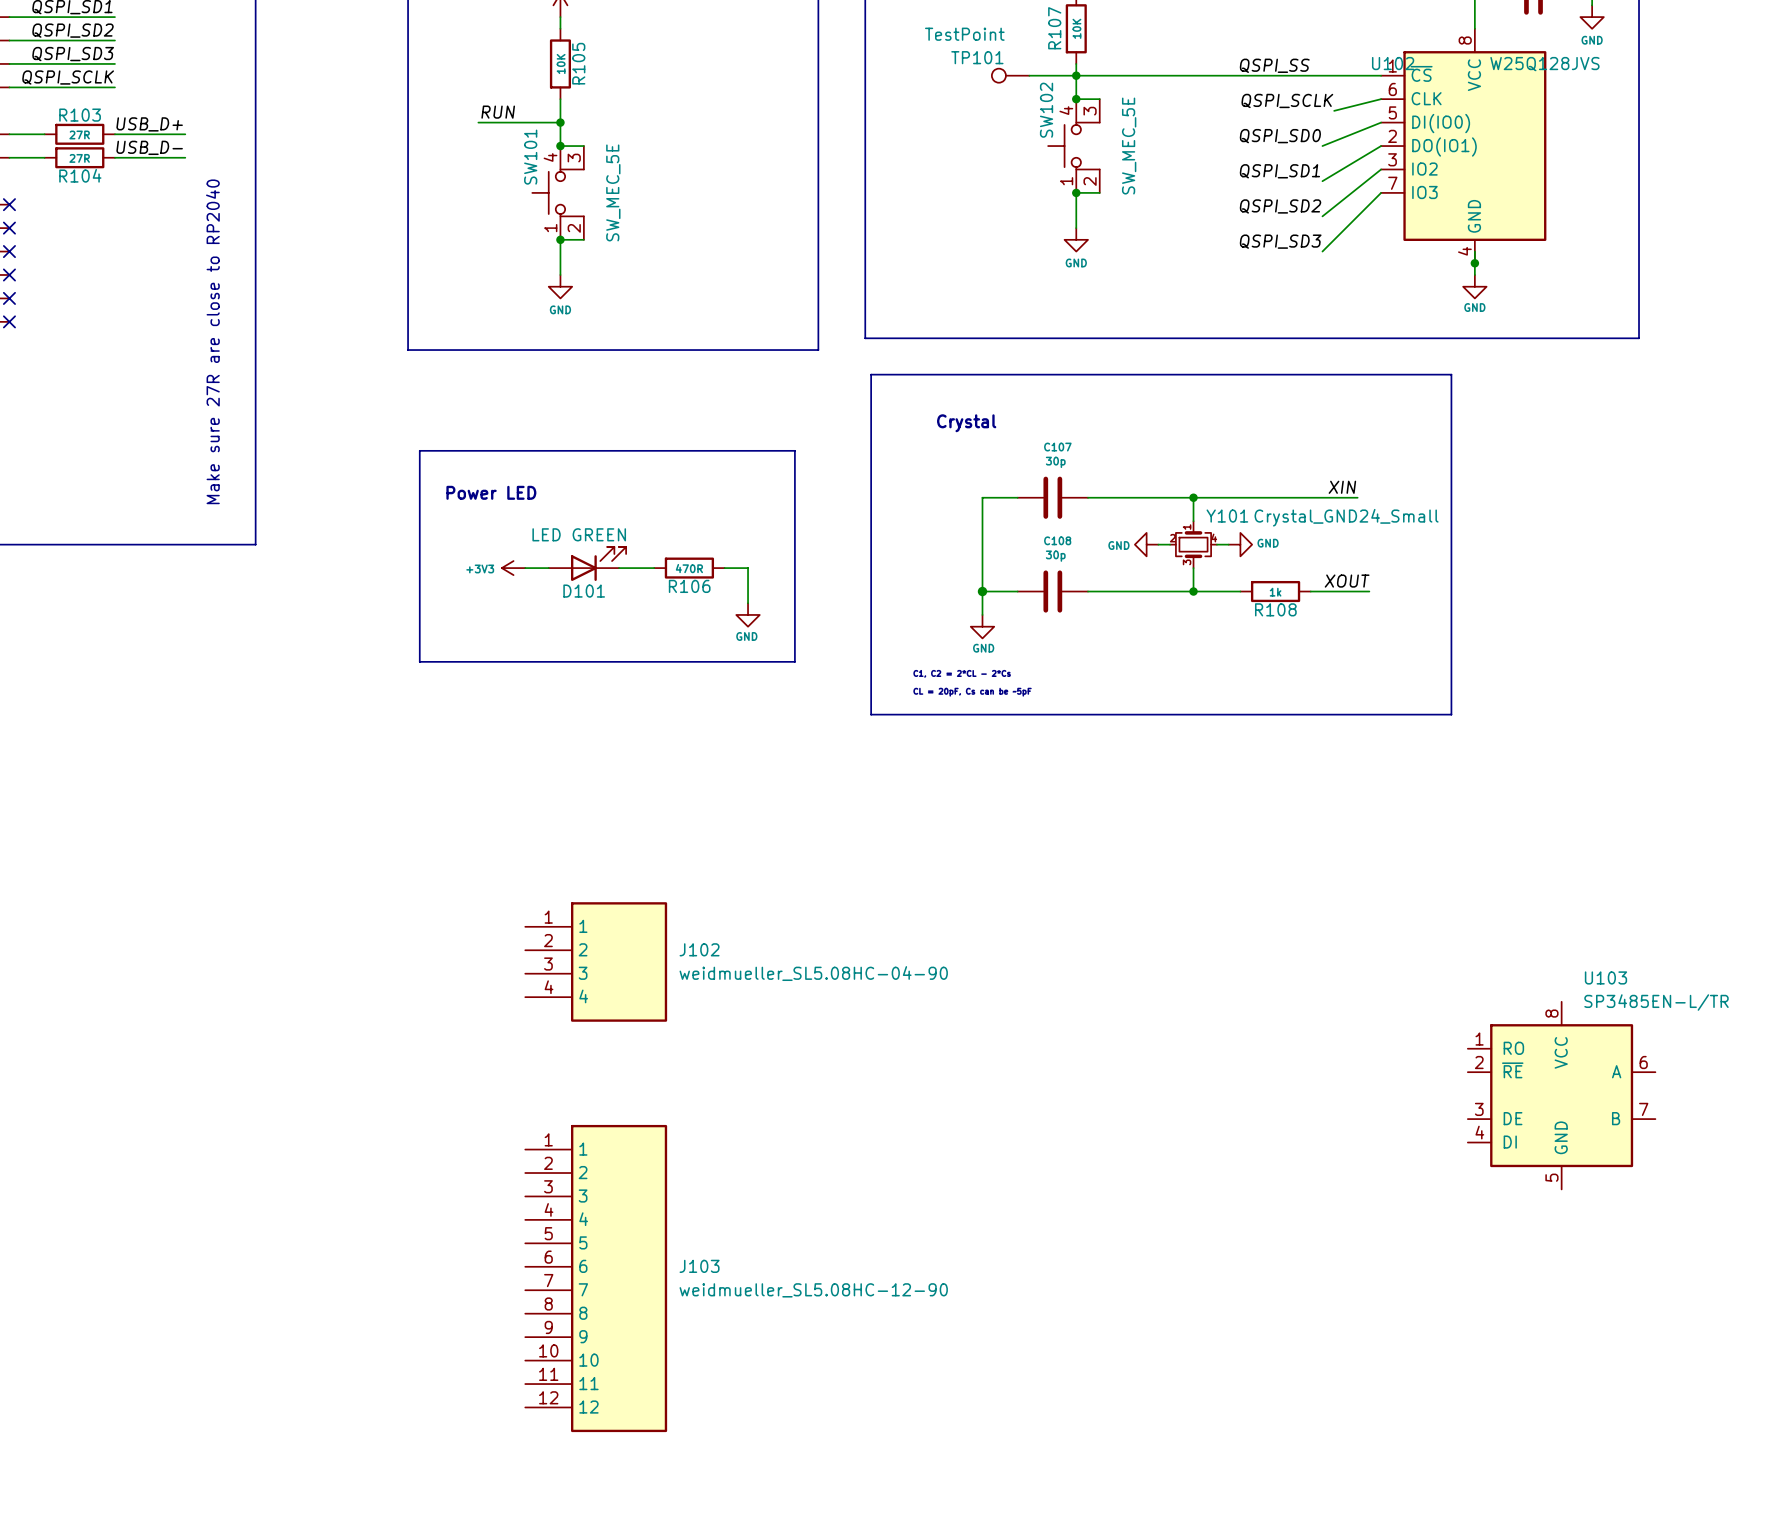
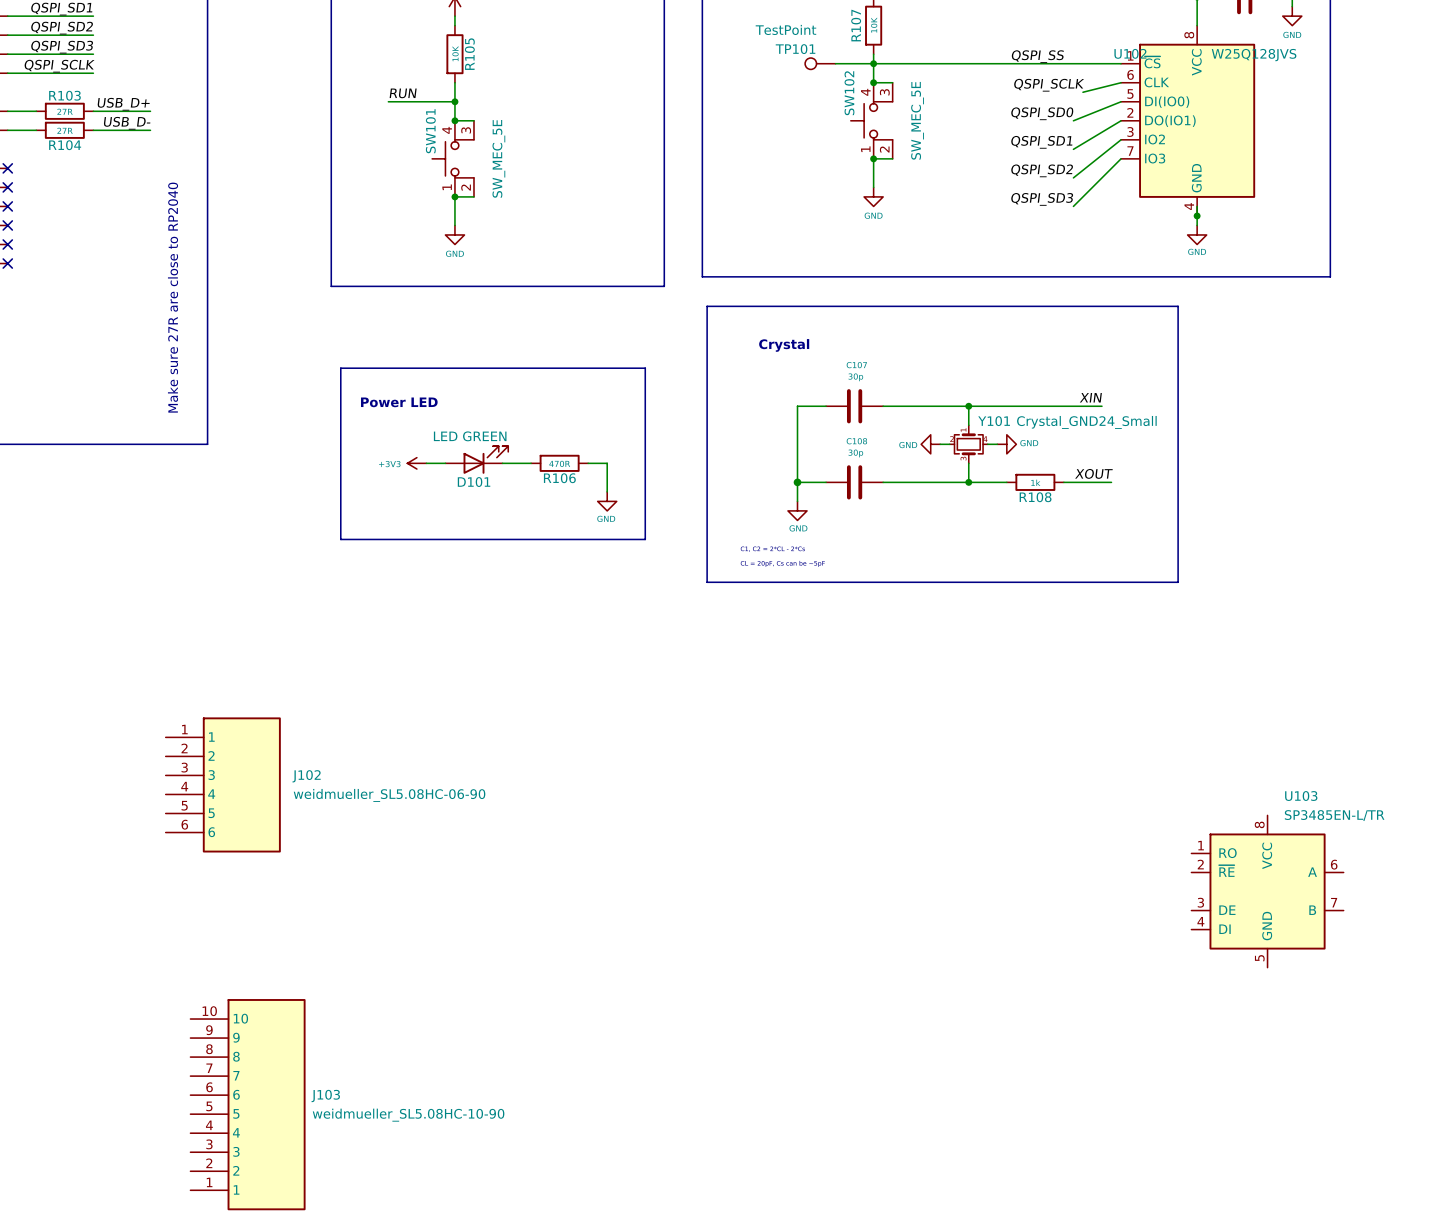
J102 symbol: [525, 902, 668, 1022] -> [165, 717, 281, 853]
J102 value: weidmueller_SL5.08HC-04-90 (813, 973) -> weidmueller_SL5.08HC-06-90 (389, 795)
J103 symbol: [525, 1124, 668, 1433] -> [190, 999, 306, 1211]
J103 value: weidmueller_SL5.08HC-12-90 (813, 1290) -> weidmueller_SL5.08HC-10-90 (408, 1115)

